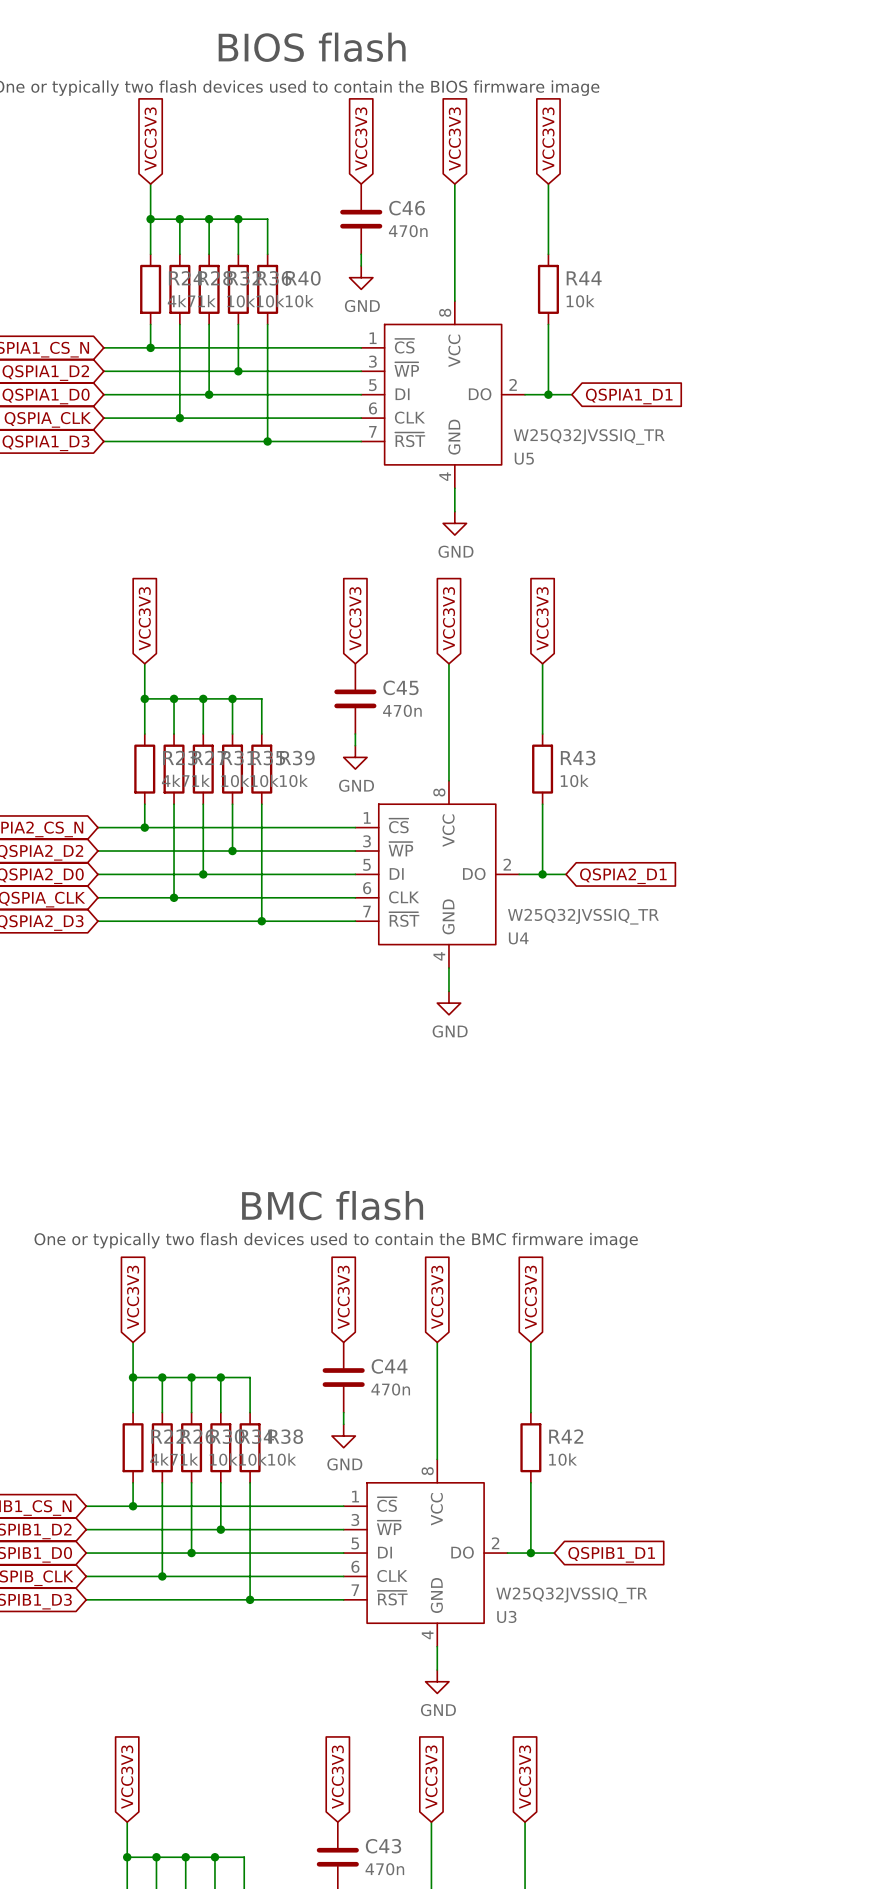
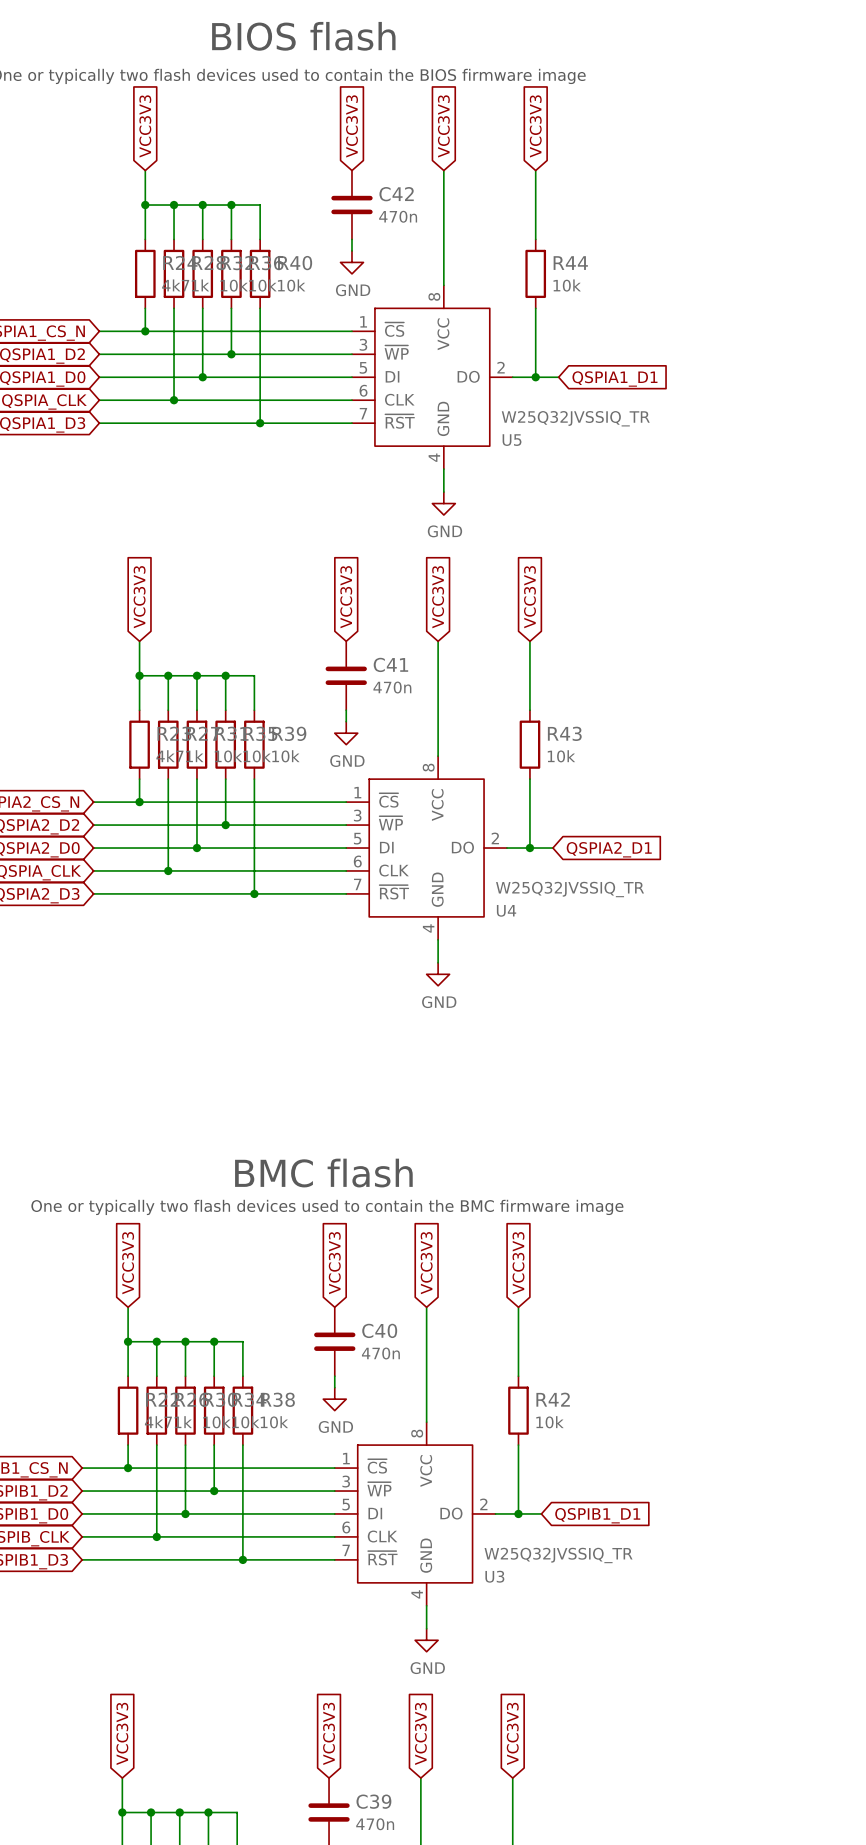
C46 name: C46 (407, 208) -> C42 (396, 194)
C45 name: C45 (400, 687) -> C41 (390, 664)
C44 name: C44 (389, 1366) -> C40 (379, 1330)
C43 name: C43 (383, 1846) -> C39 (373, 1801)

